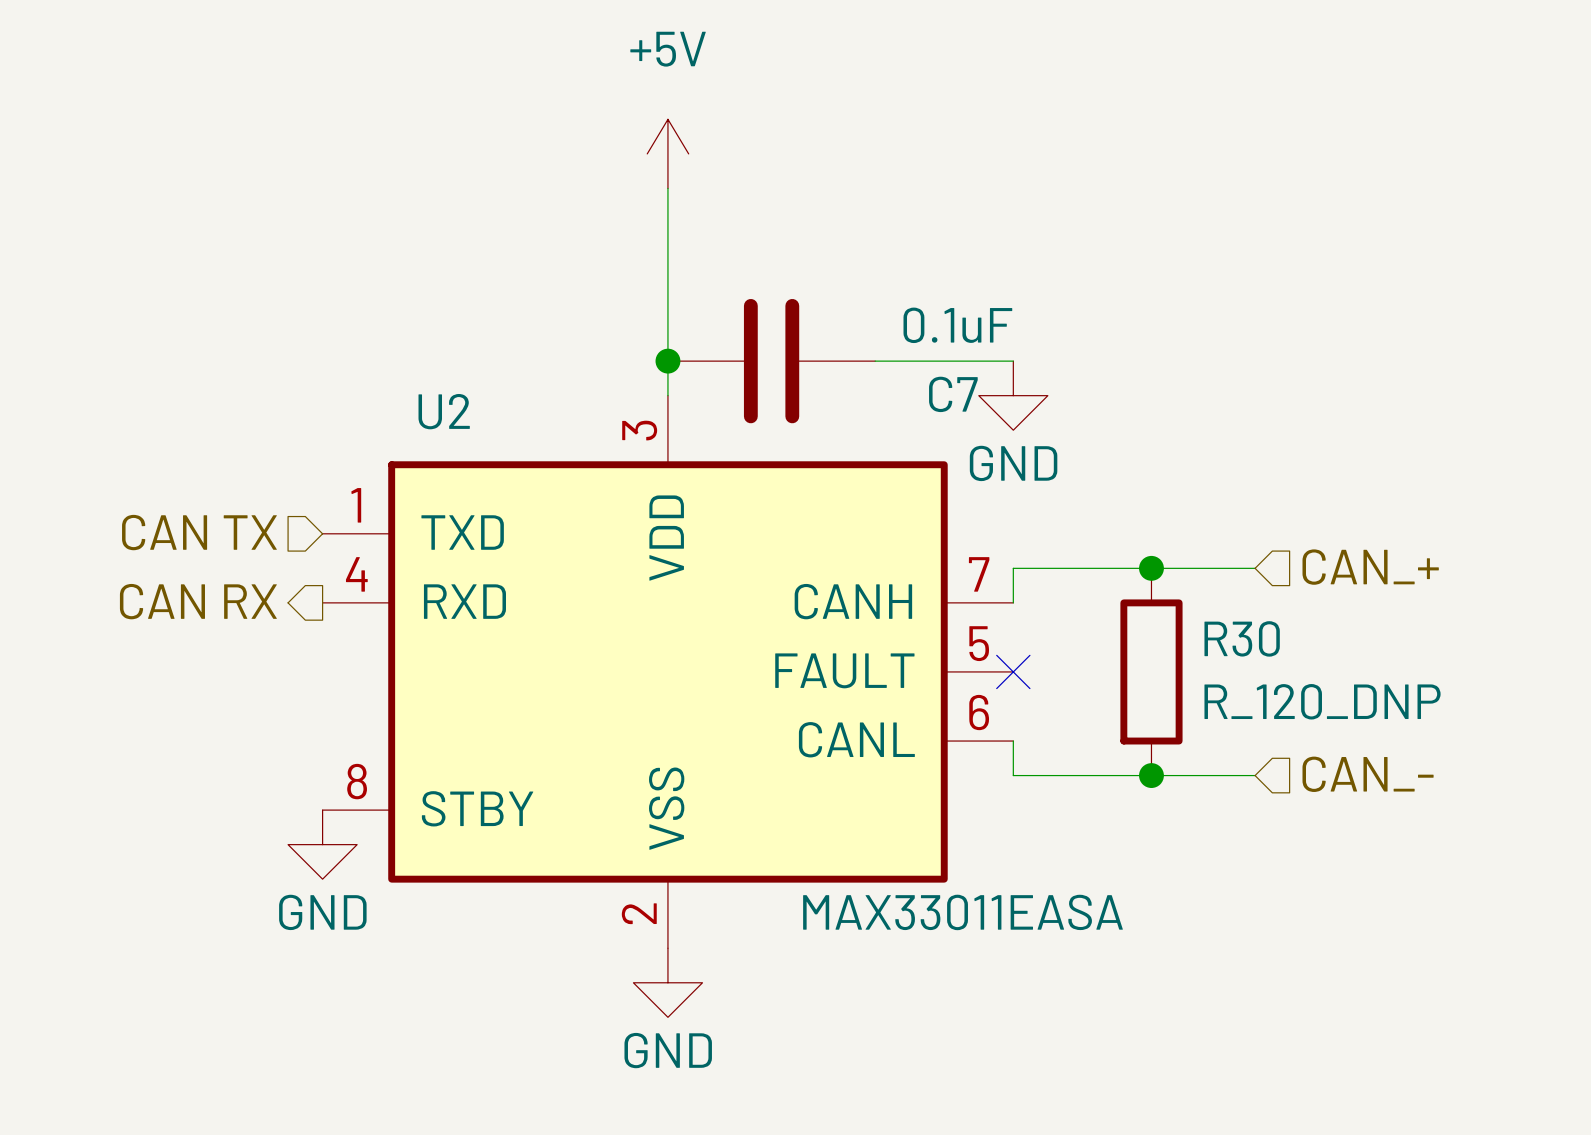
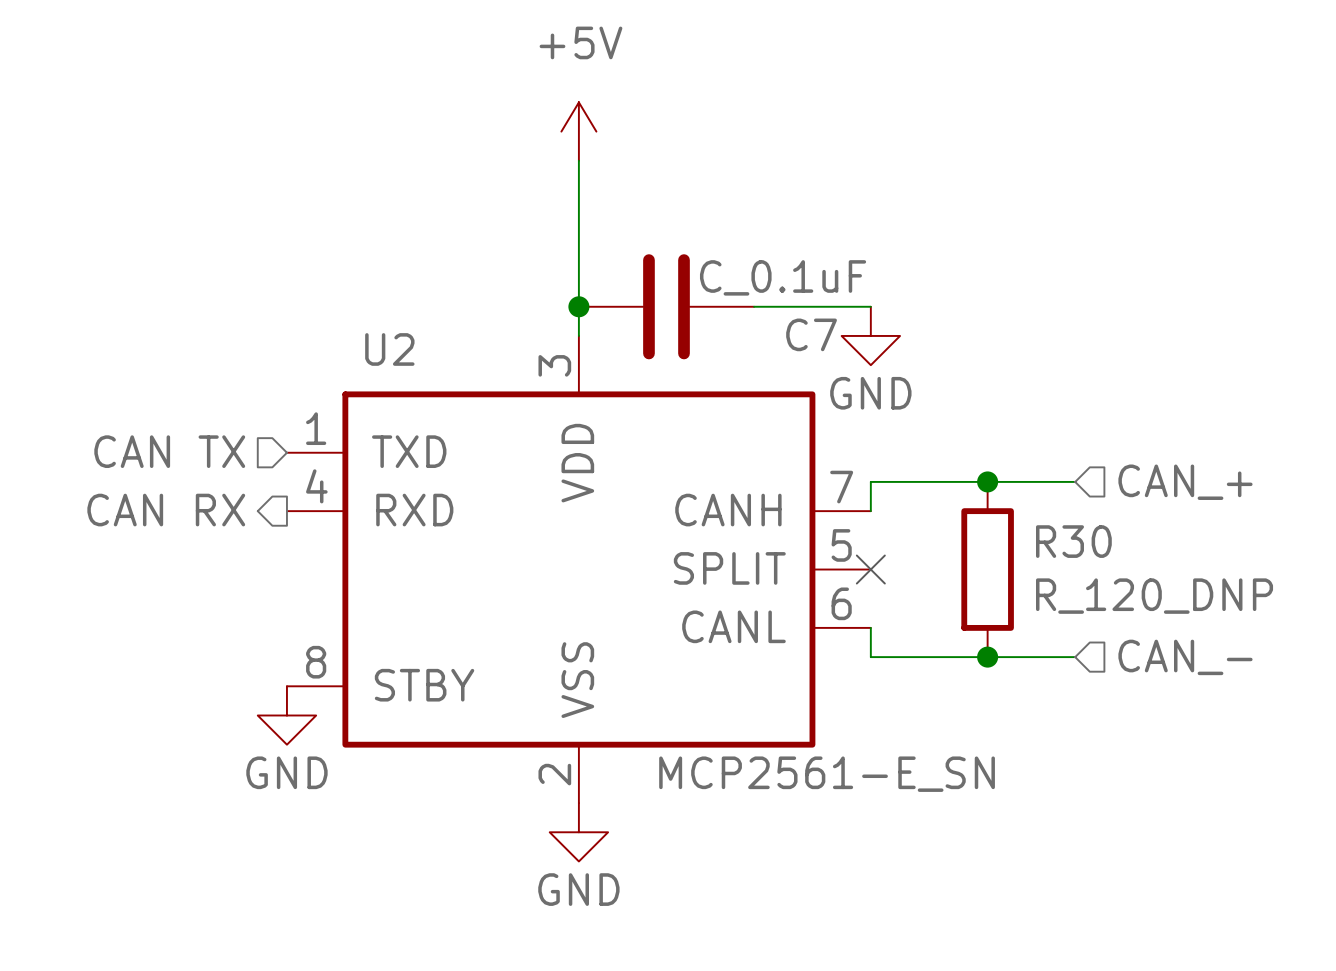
C7 value: 0.1uF (957, 325) -> C_0.1uF (783, 277)
U2 pin name: FAULT (844, 670) -> SPLIT (729, 568)
U2 value: MAX33011EASA (962, 912) -> MCP2561-E_SN (827, 774)

